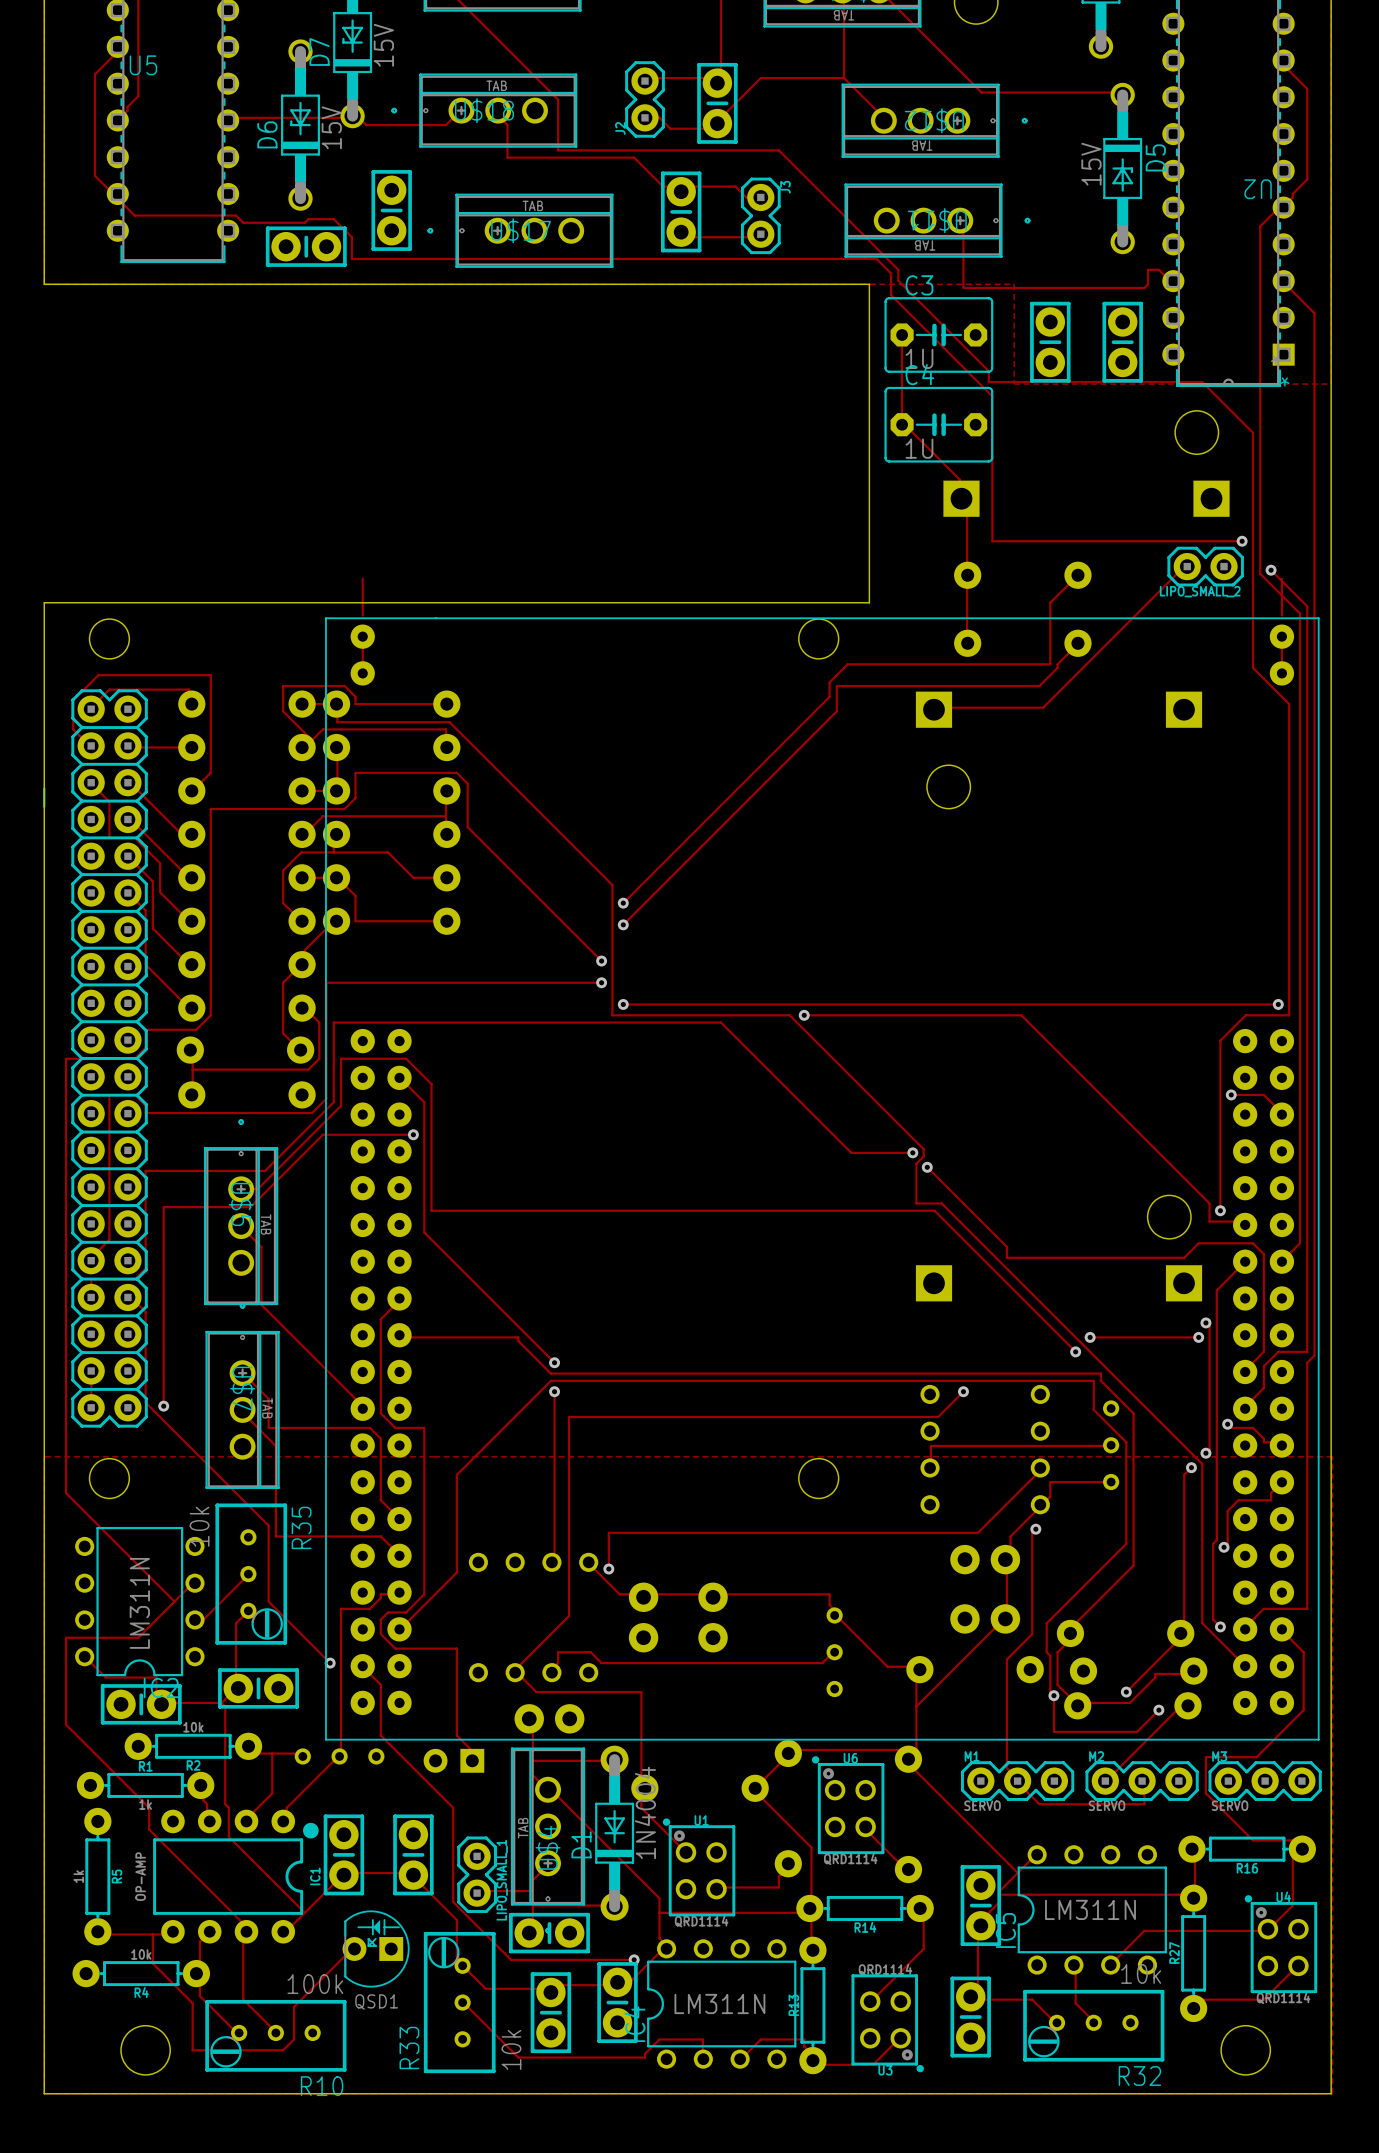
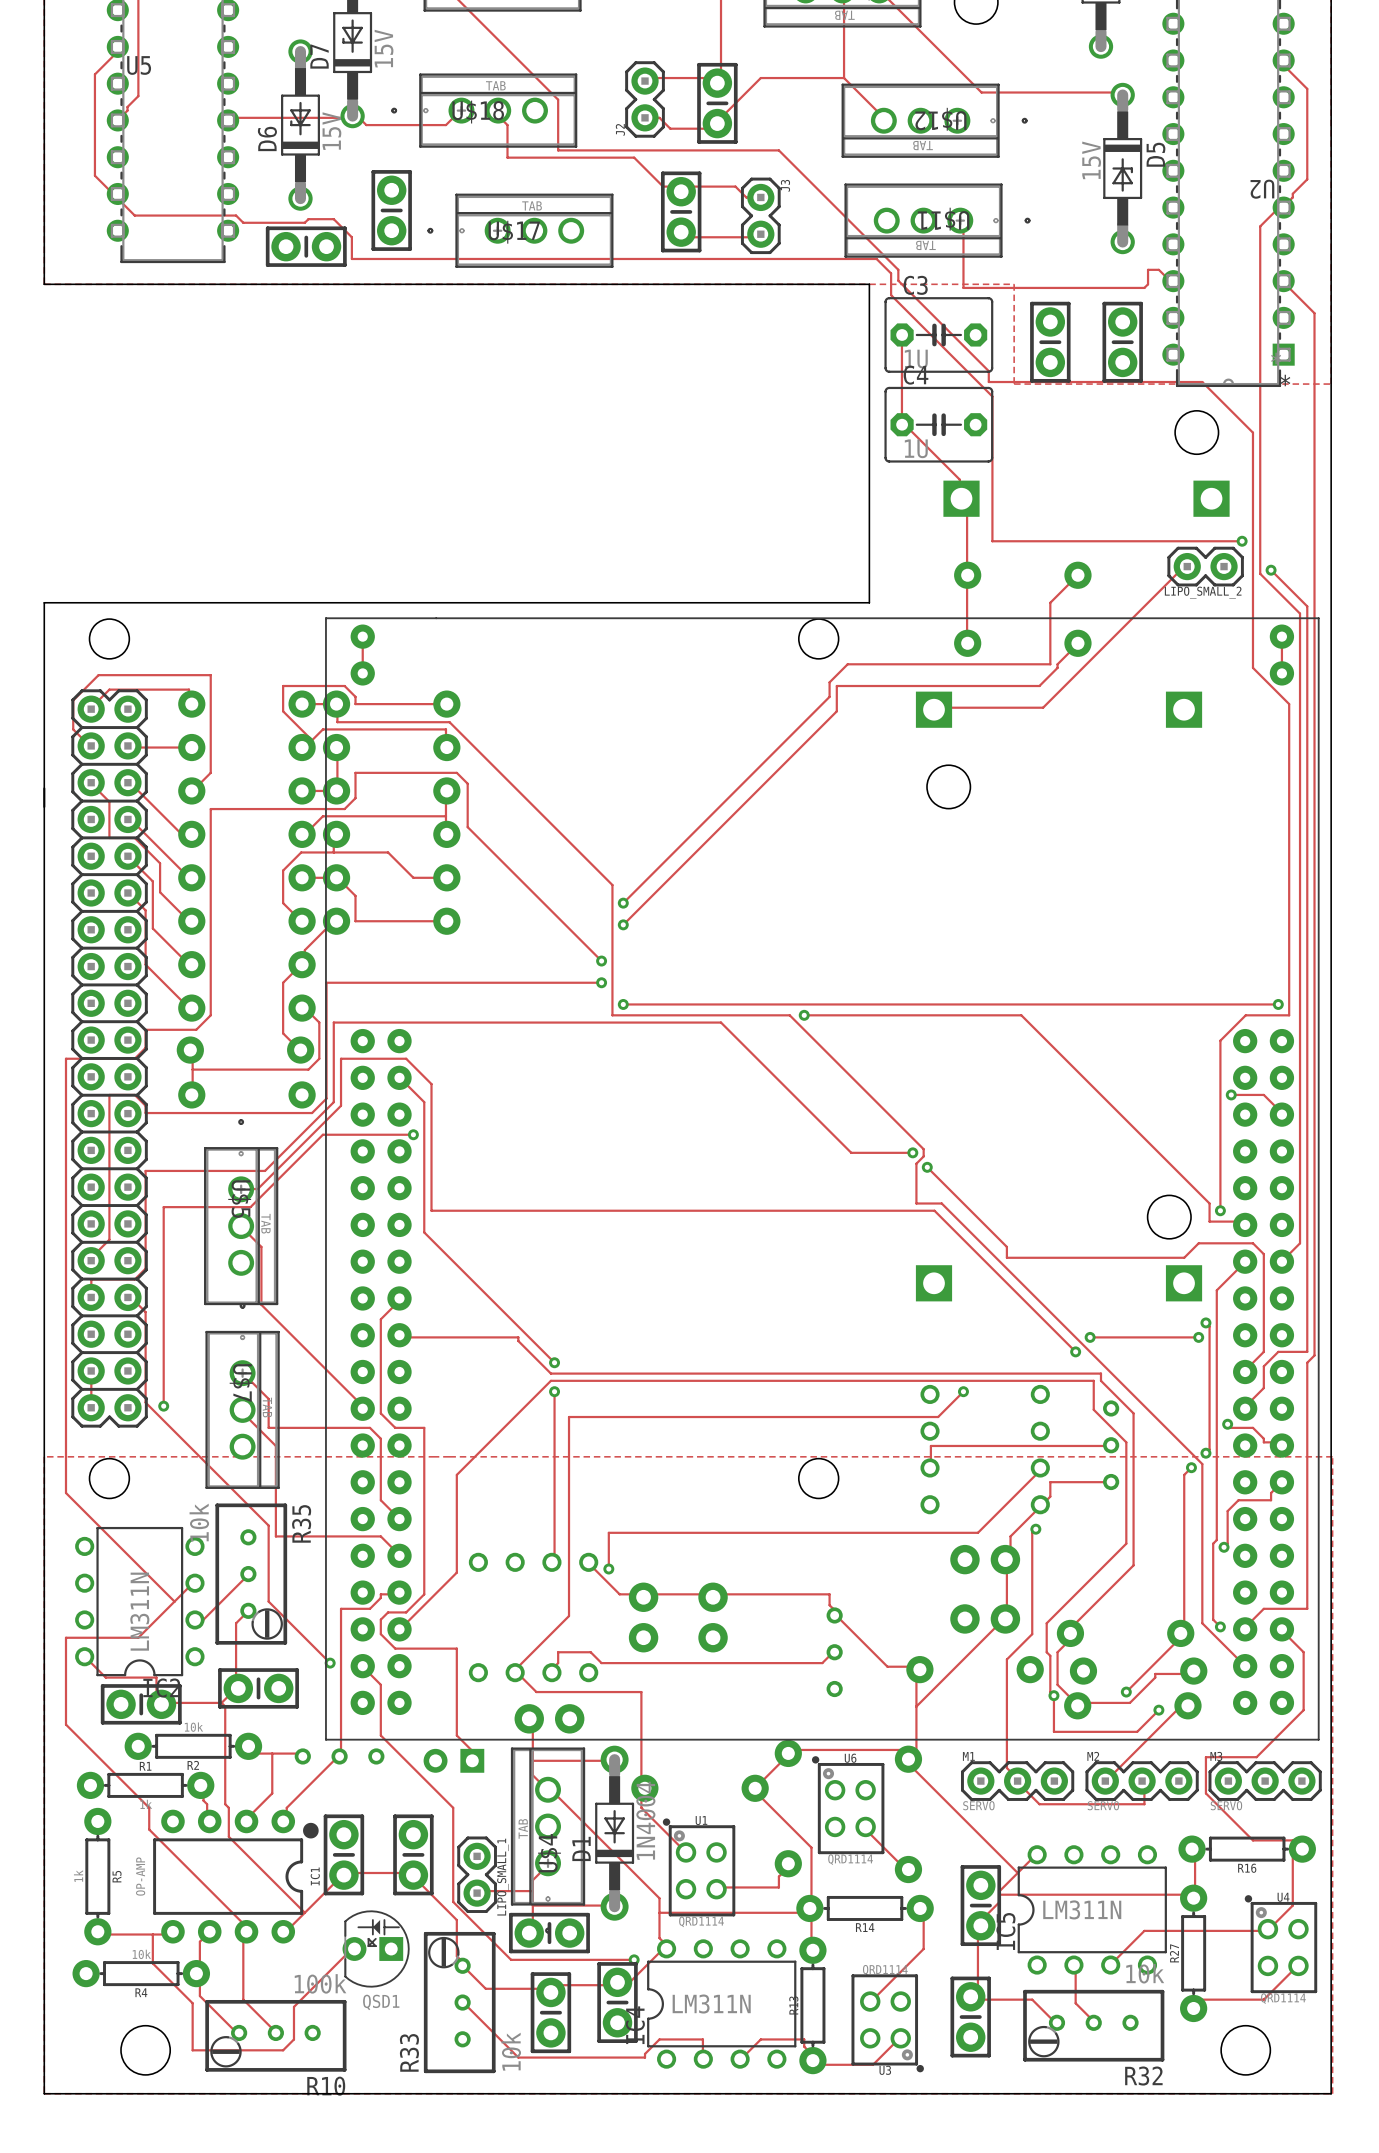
track: (362, 578) (362, 615) -> none
track: (1281, 578) (1281, 615) -> none

